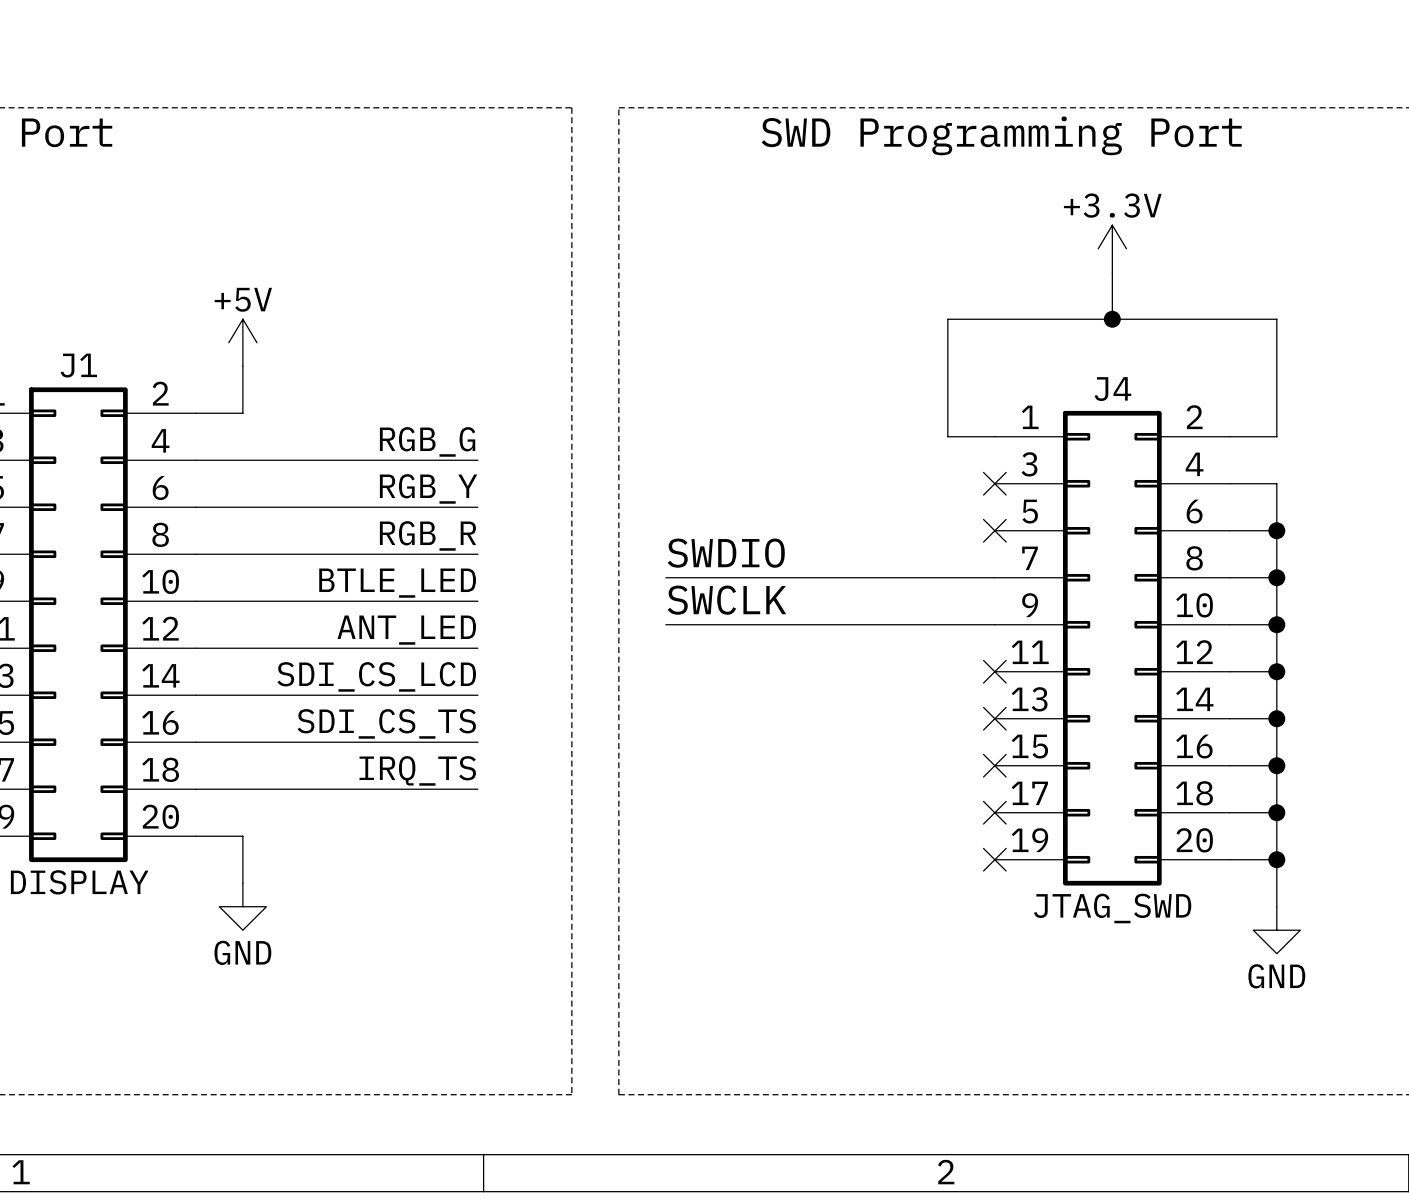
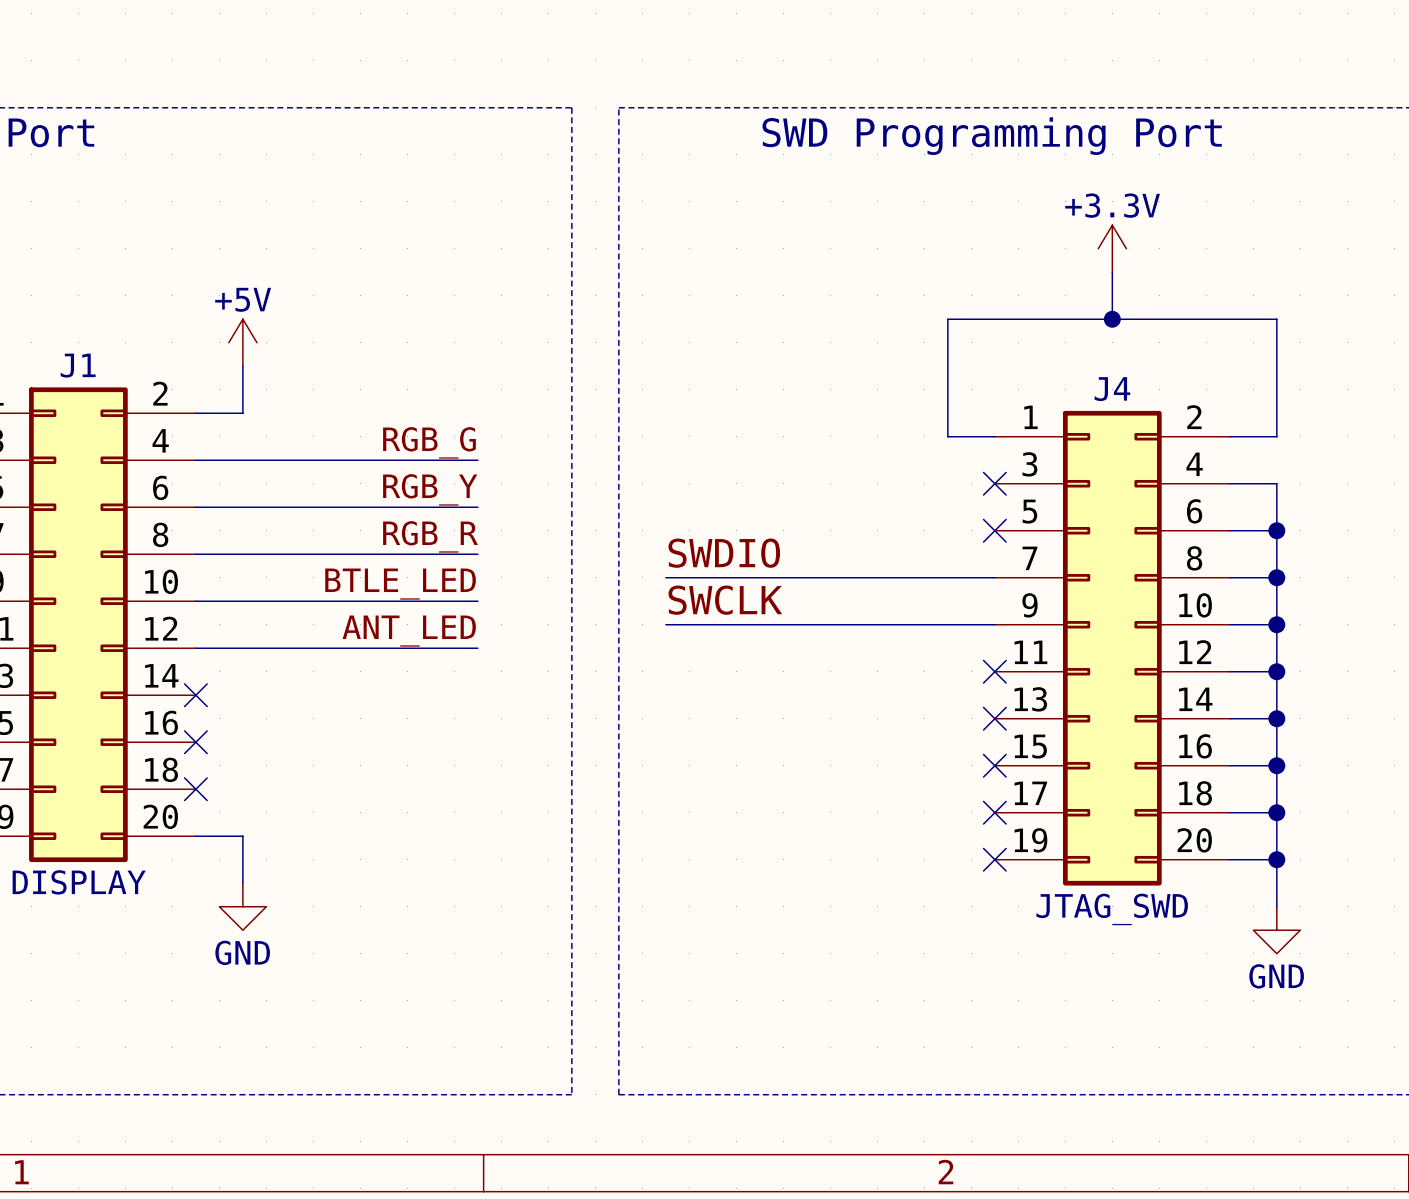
label: SDI_CS_LCD (376, 676) -> none
wire: (195, 695) (477, 695) -> none
no-connect mark: none -> (195, 695)
label: SDI_CS_TS (386, 723) -> none
wire: (195, 742) (477, 742) -> none
no-connect mark: none -> (195, 742)
label: IRQ_TS (417, 770) -> none
wire: (195, 789) (477, 789) -> none
no-connect mark: none -> (195, 789)

